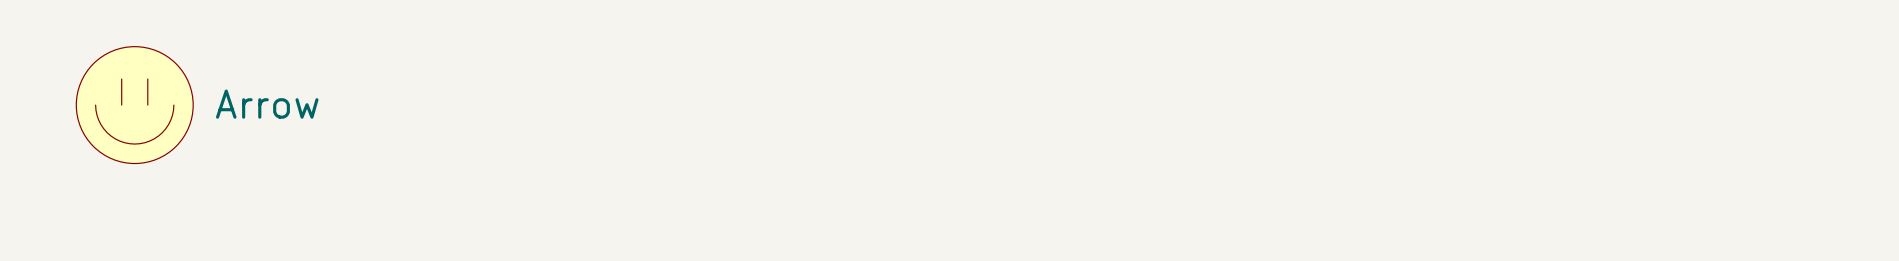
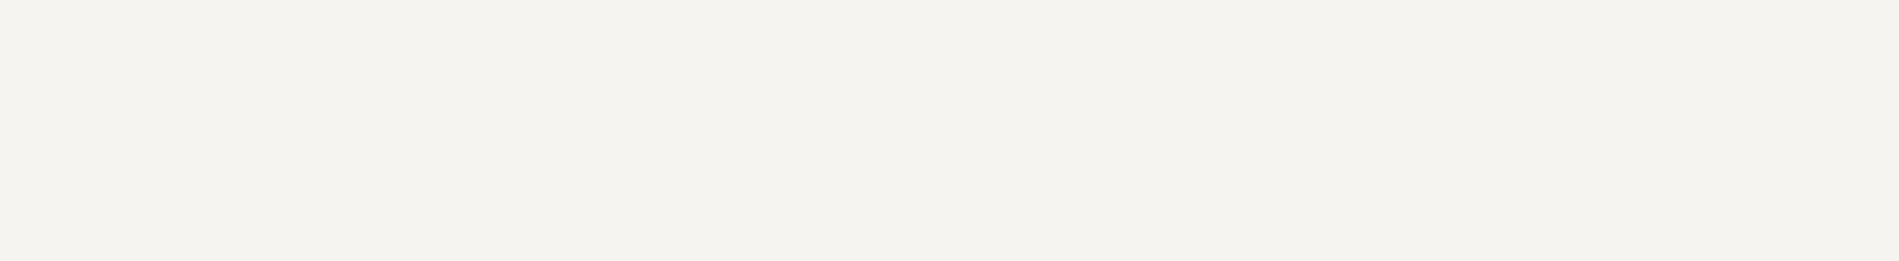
part: Arrow (134, 105) -> none

